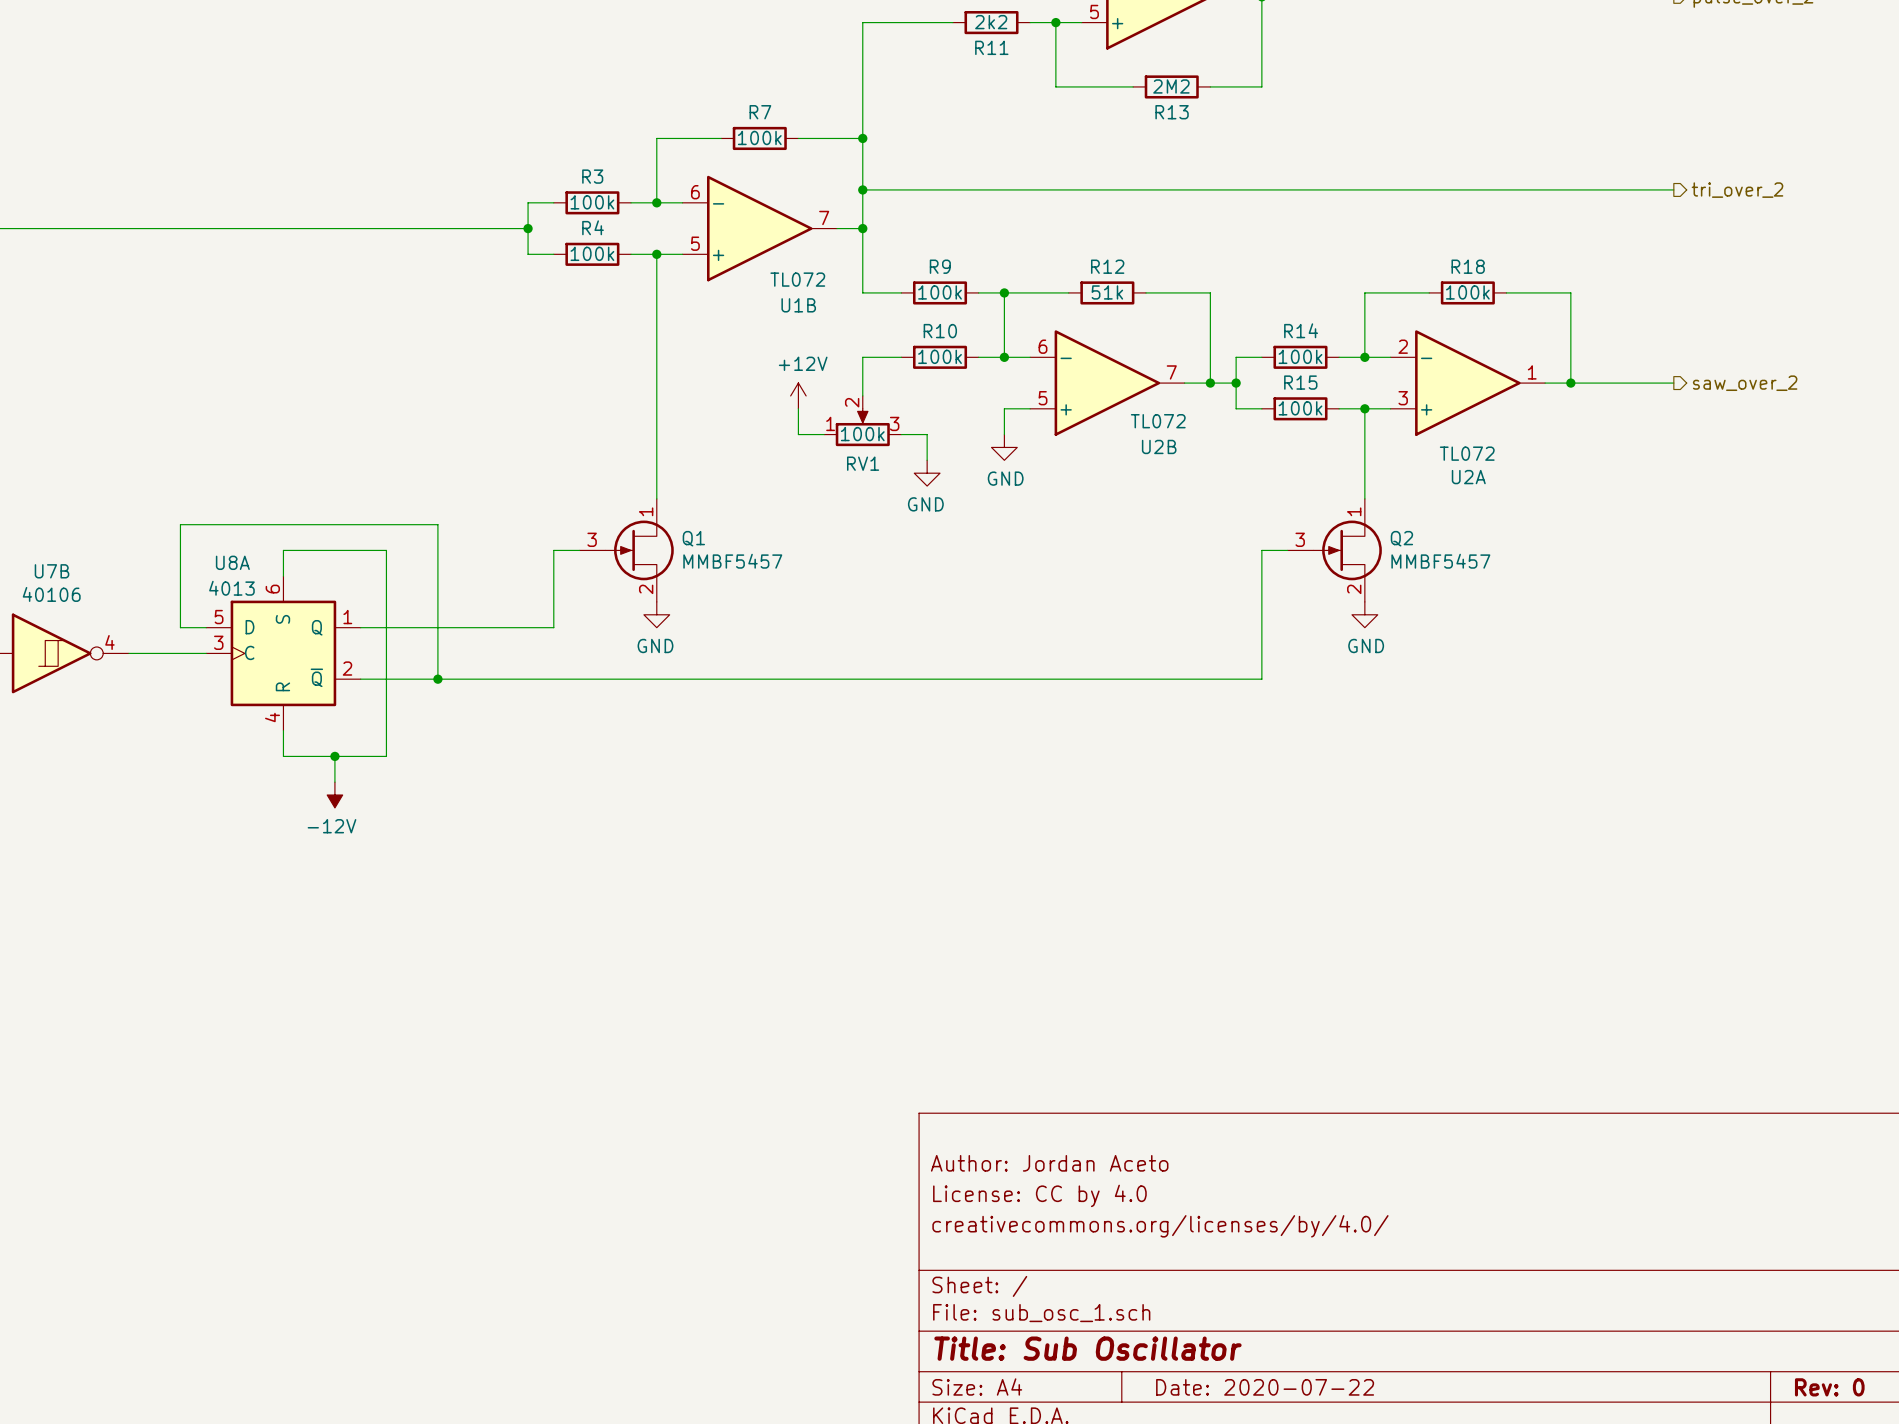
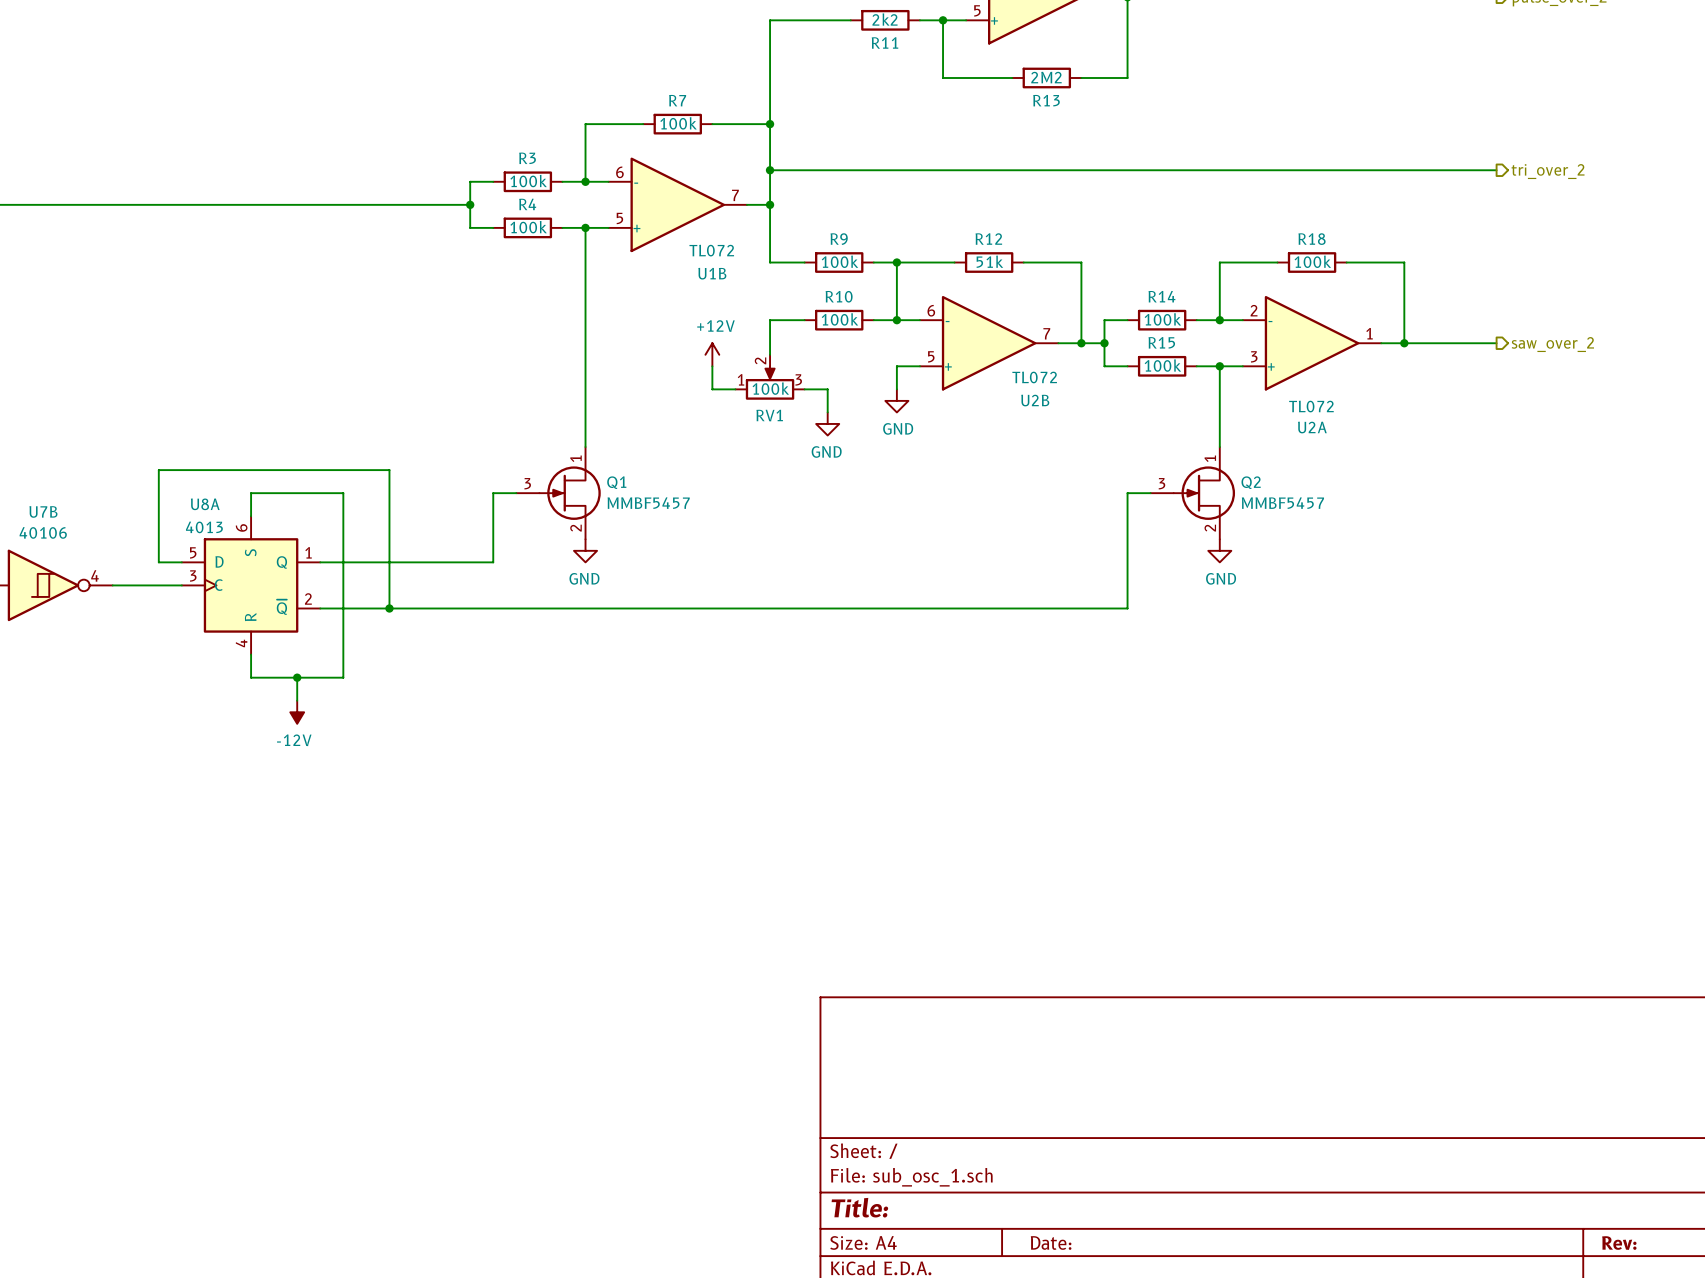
title block: Author: Jordan Aceto (1049, 1163) -> none
title block: License: CC by 4.0 (1039, 1195) -> none
title block: creativecommons.org/licenses/by/4.0/ (1160, 1226) -> none
title block: Title: Sub Oscillator (1087, 1348) -> Title: (859, 1207)
title block: Date: 2020-07-22 (1265, 1387) -> Date: (1051, 1242)
title block: Rev: 0 (1829, 1387) -> Rev: (1619, 1243)

